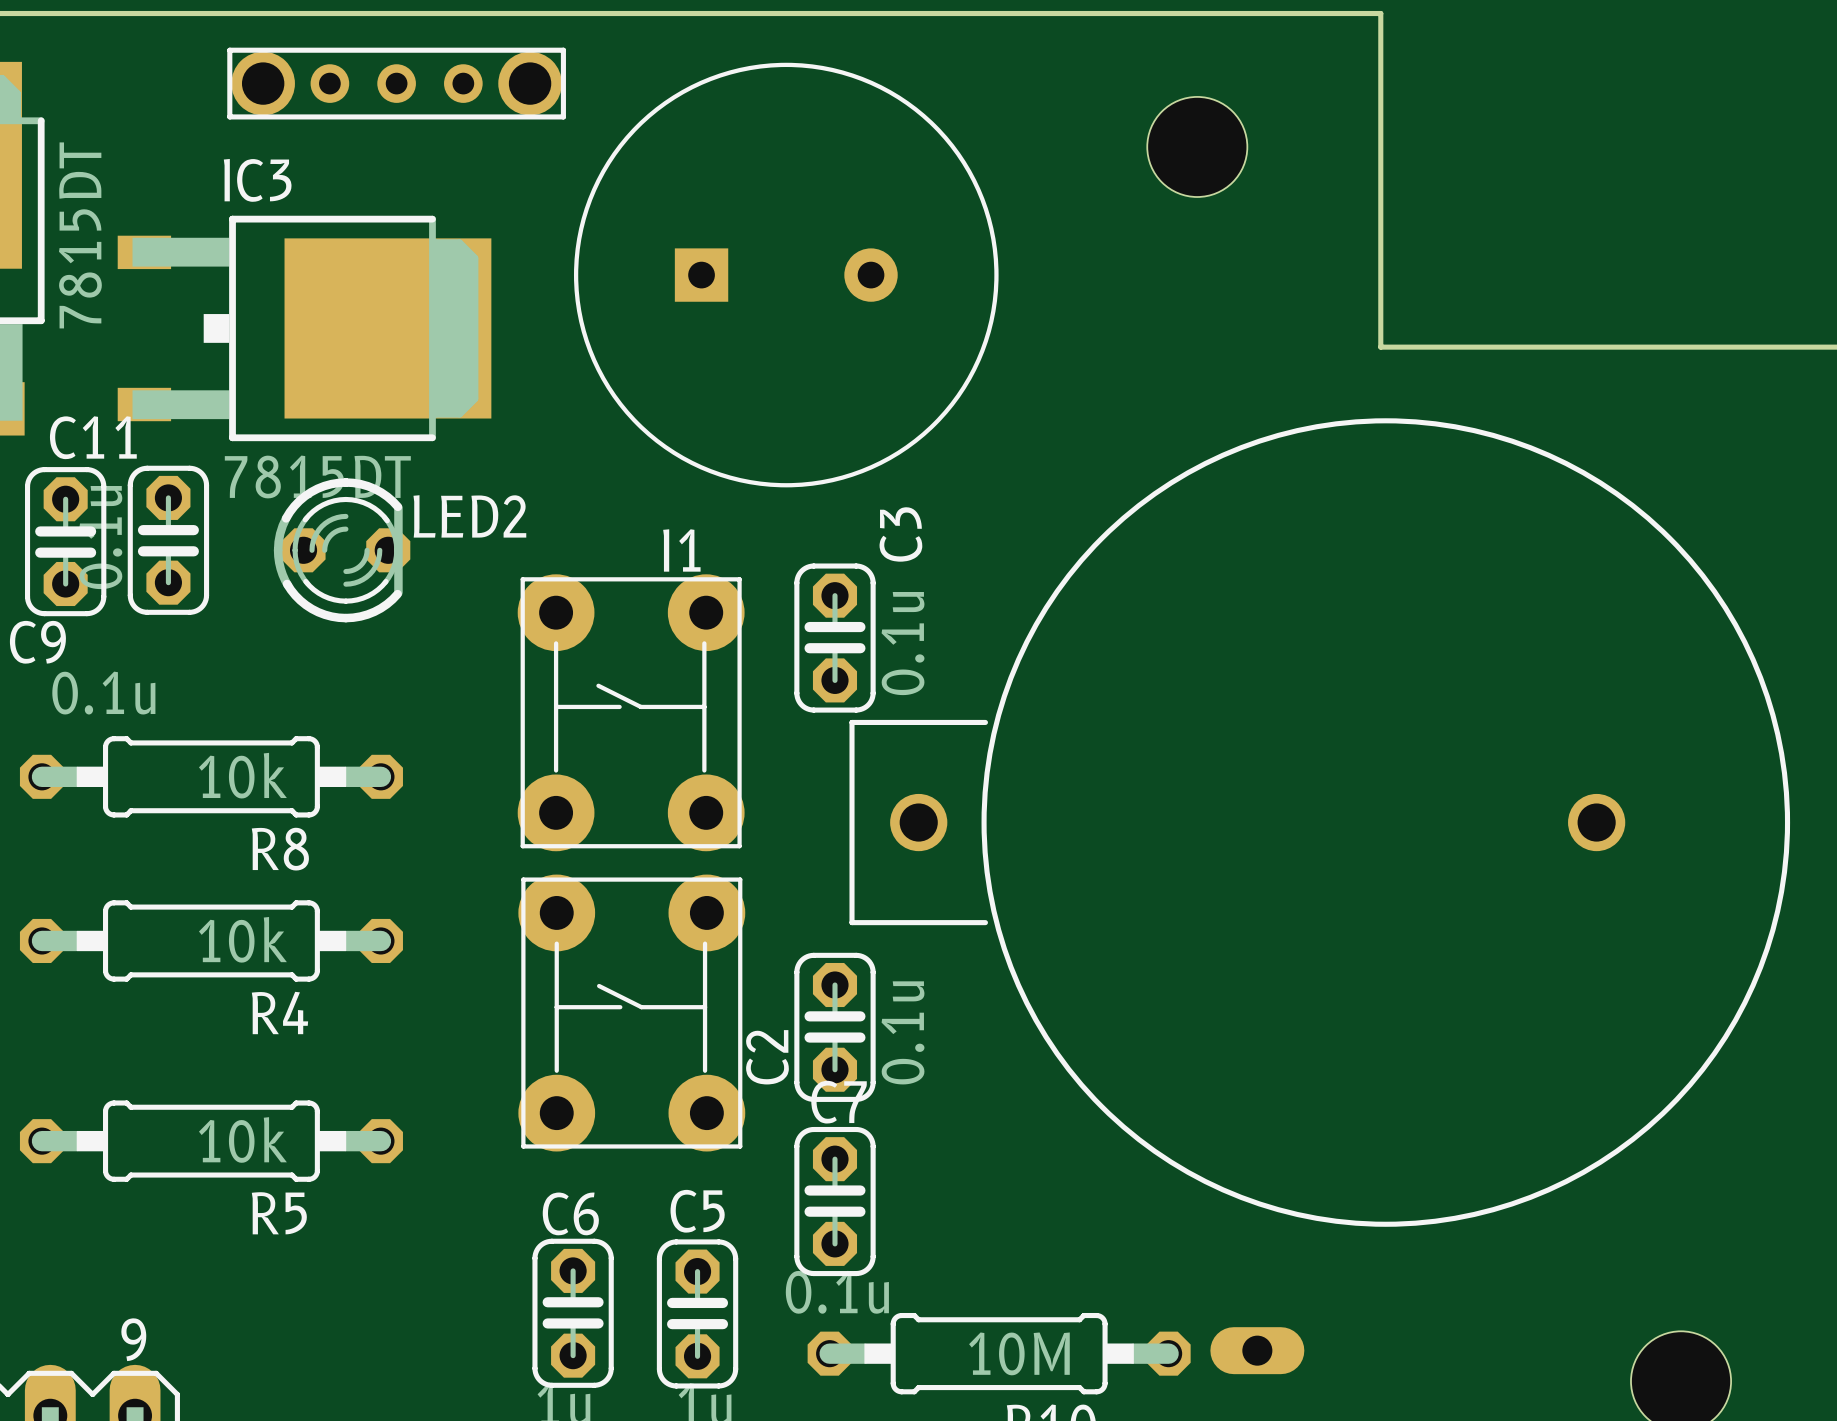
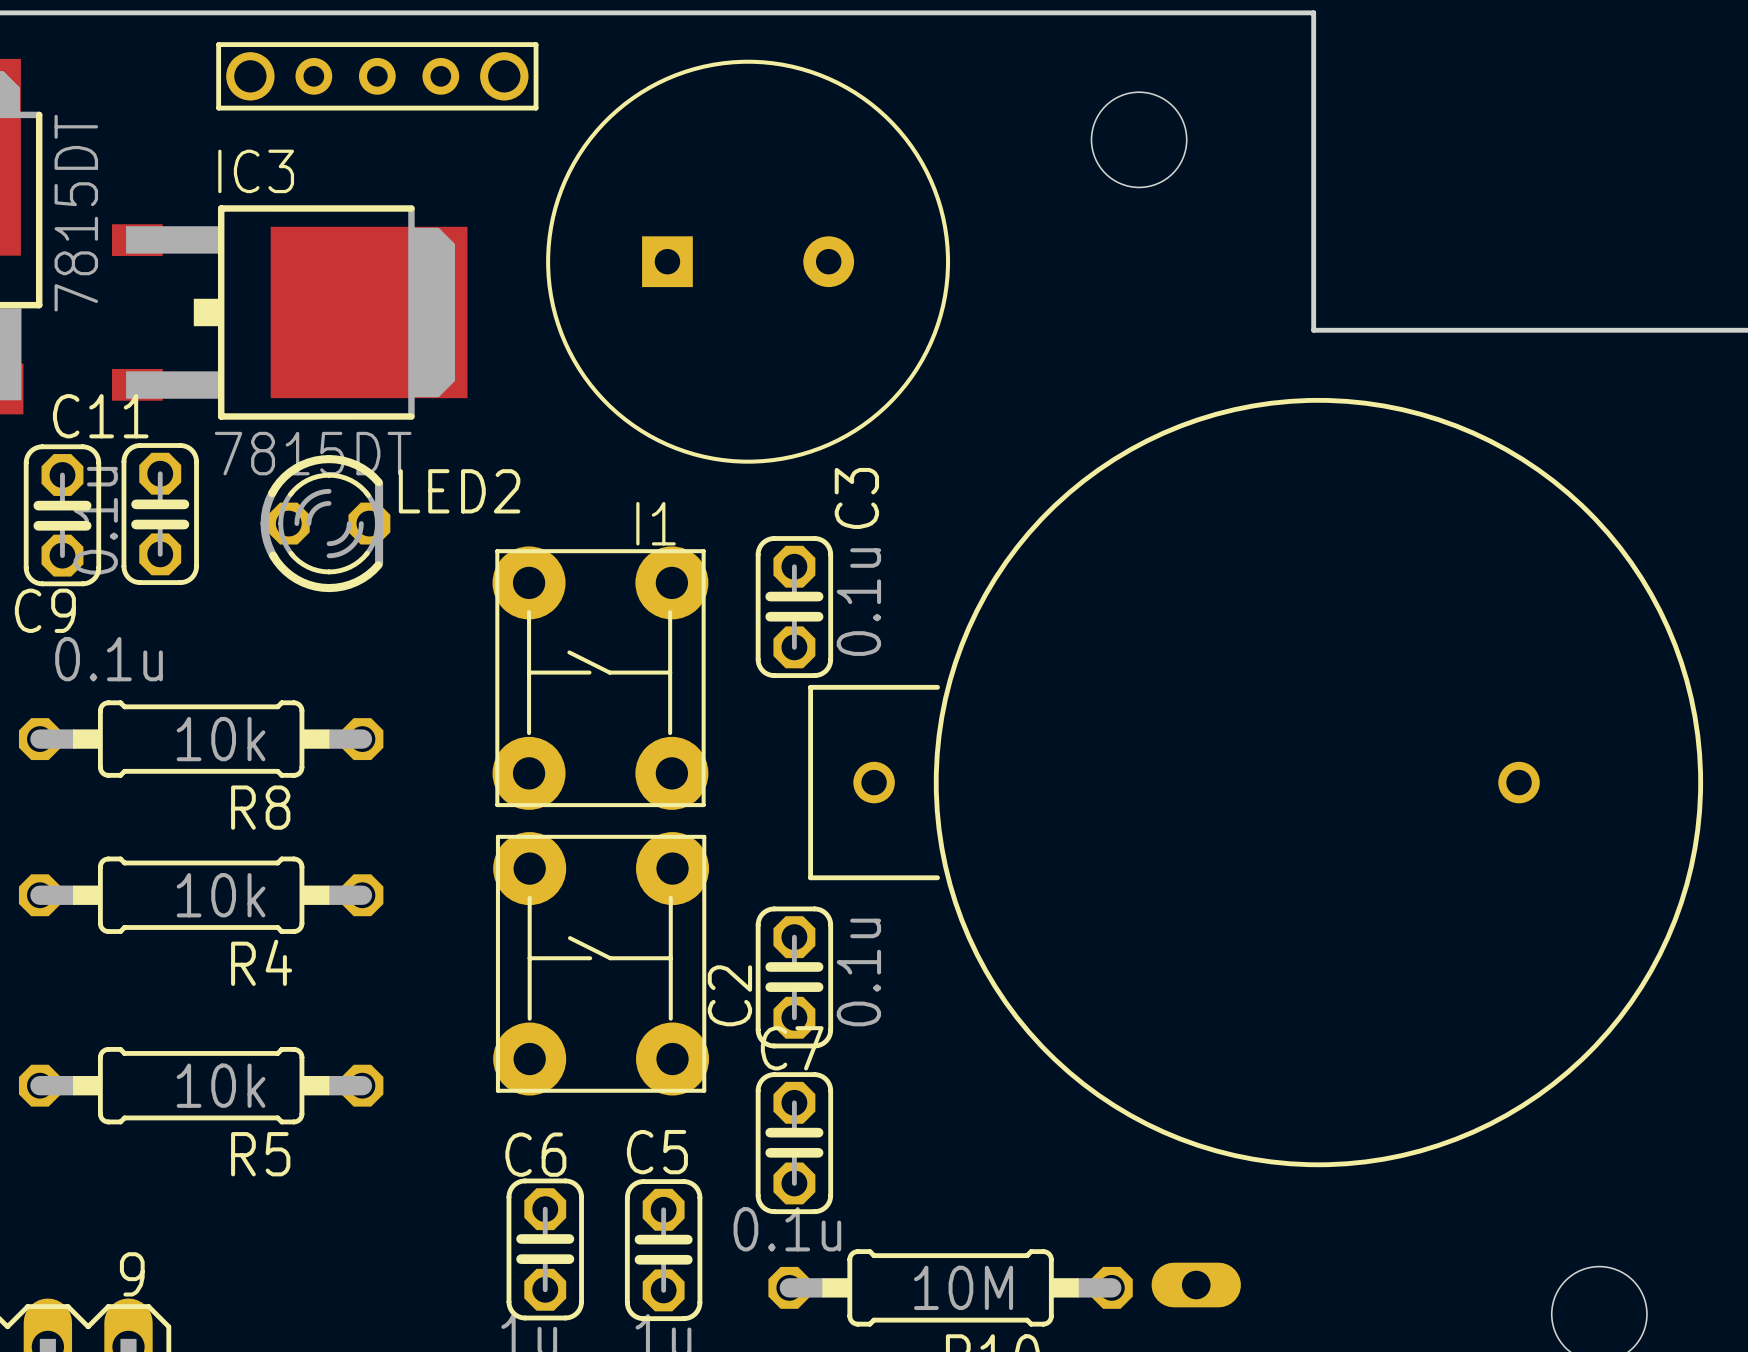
part footprint: [227, 47, 566, 120] -> [216, 42, 539, 111]
part footprint: [849, 418, 1791, 1227] -> [808, 397, 1704, 1168]

